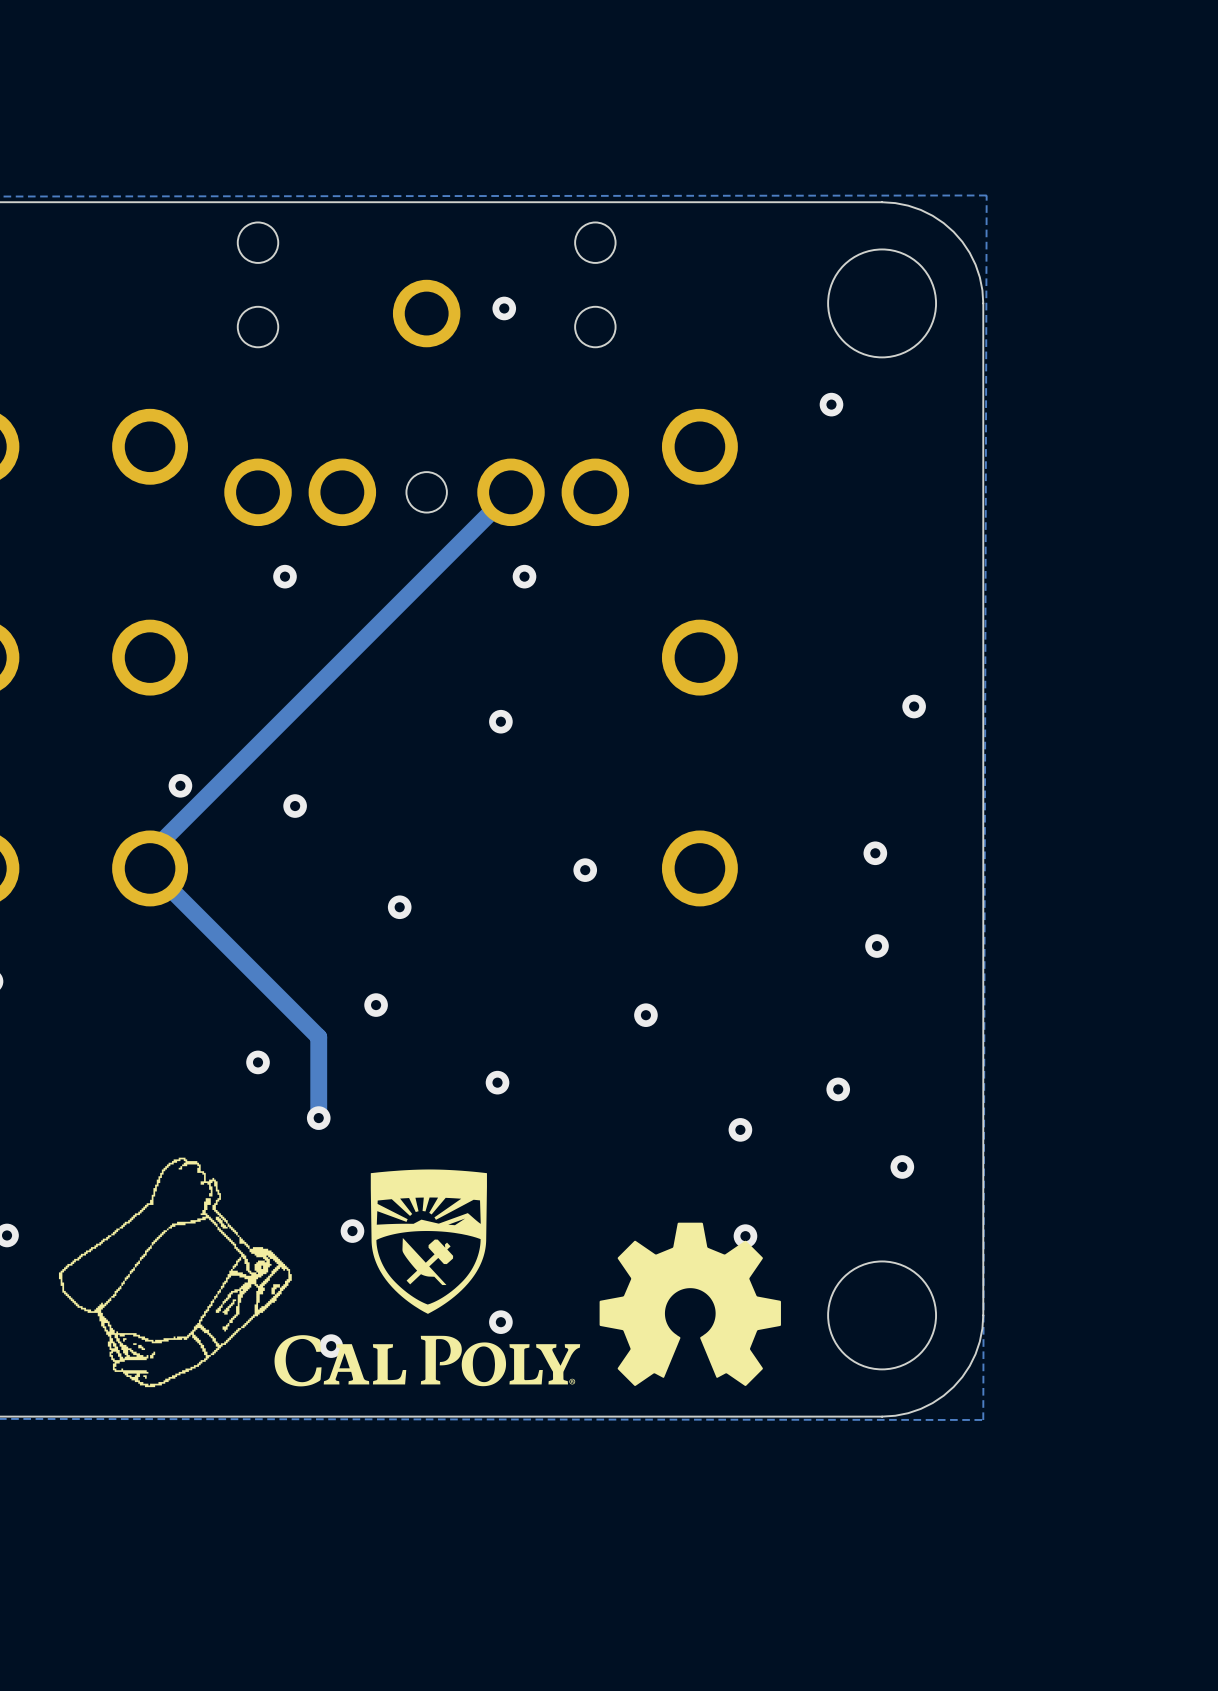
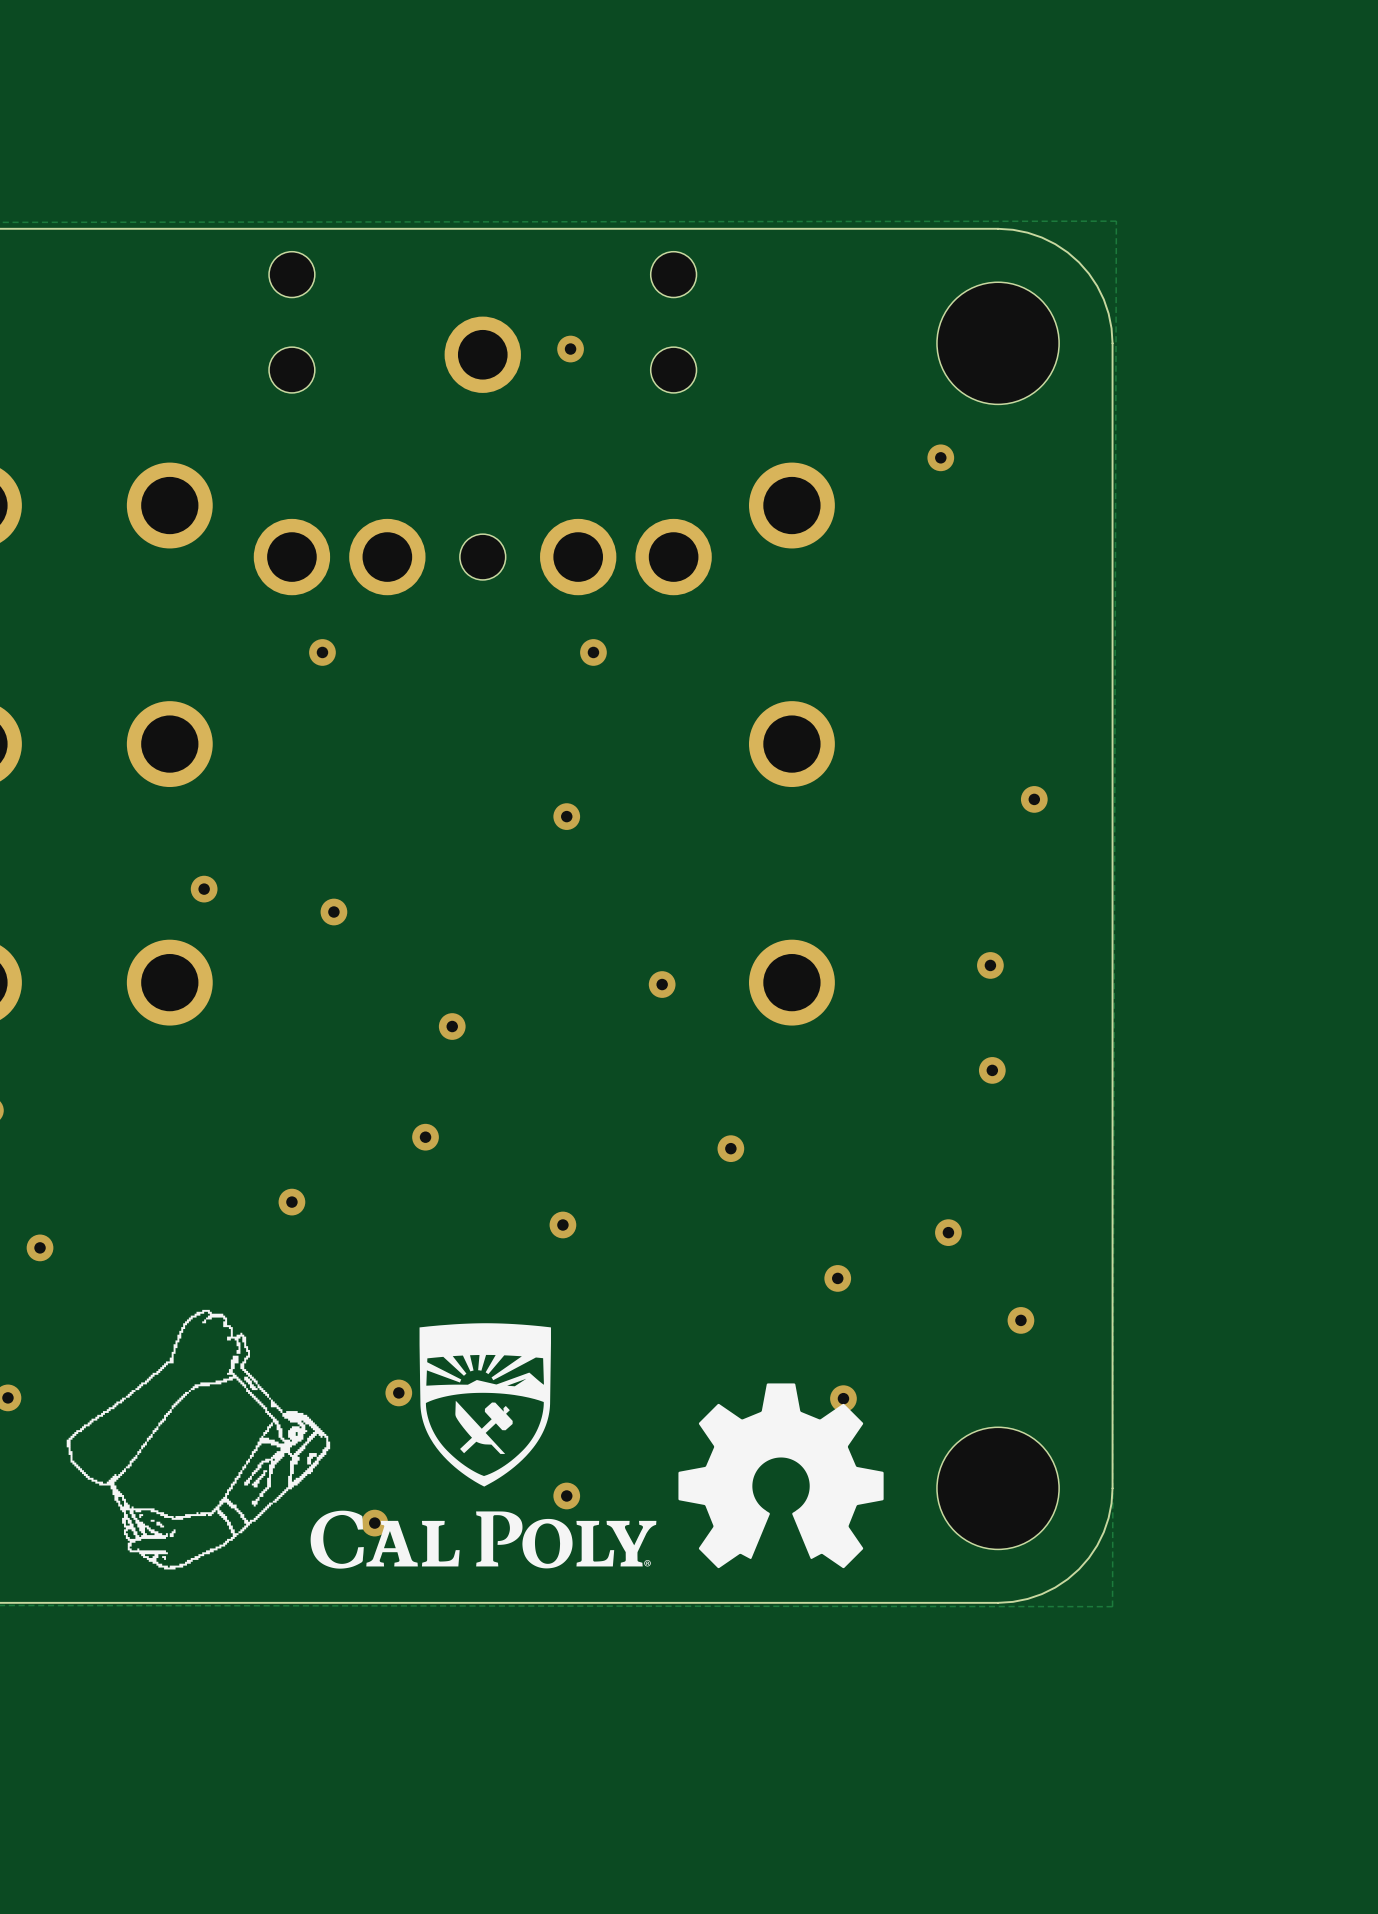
track: (511, 492) (150, 853) (150, 868) (318, 1037) (318, 1121) -> none
via: none -> (40, 1247)
via: (318, 1118) -> none

